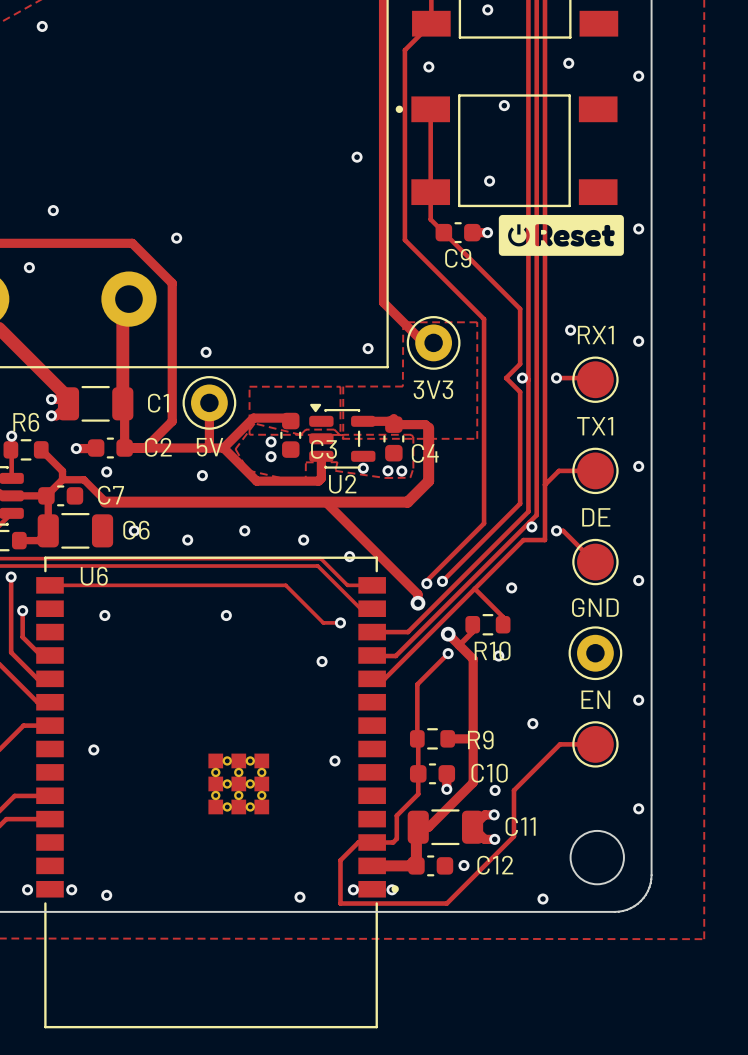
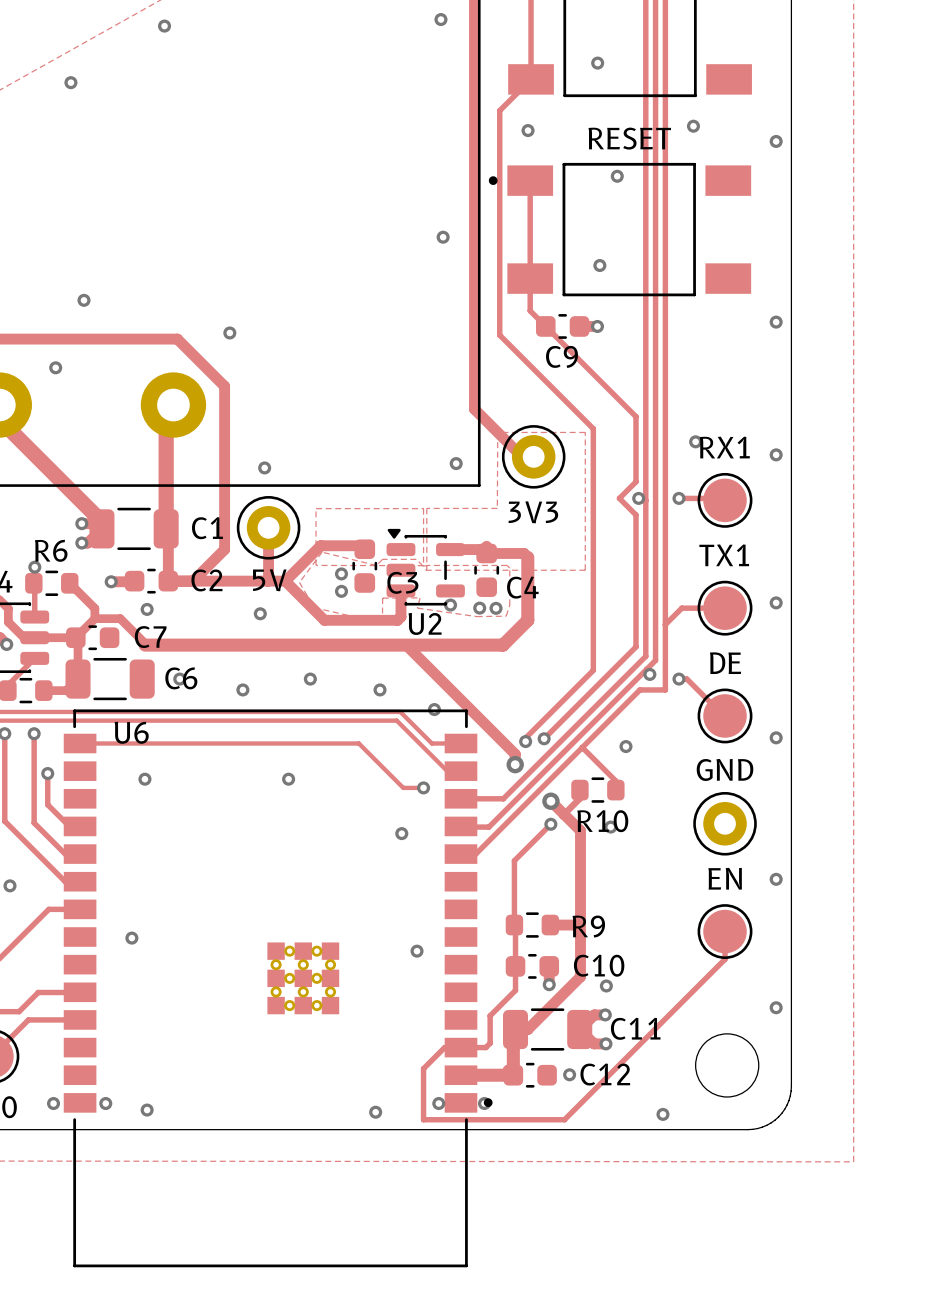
part value: none -> RESET (629, 138)
drawing: [498, 214, 624, 256] -> none
via: (532, 723) -> none
track: (595, 744) (560, 744) (513, 790) (513, 836) (446, 903) -> (725, 931) (725, 959) (564, 1119) (549, 1119)

